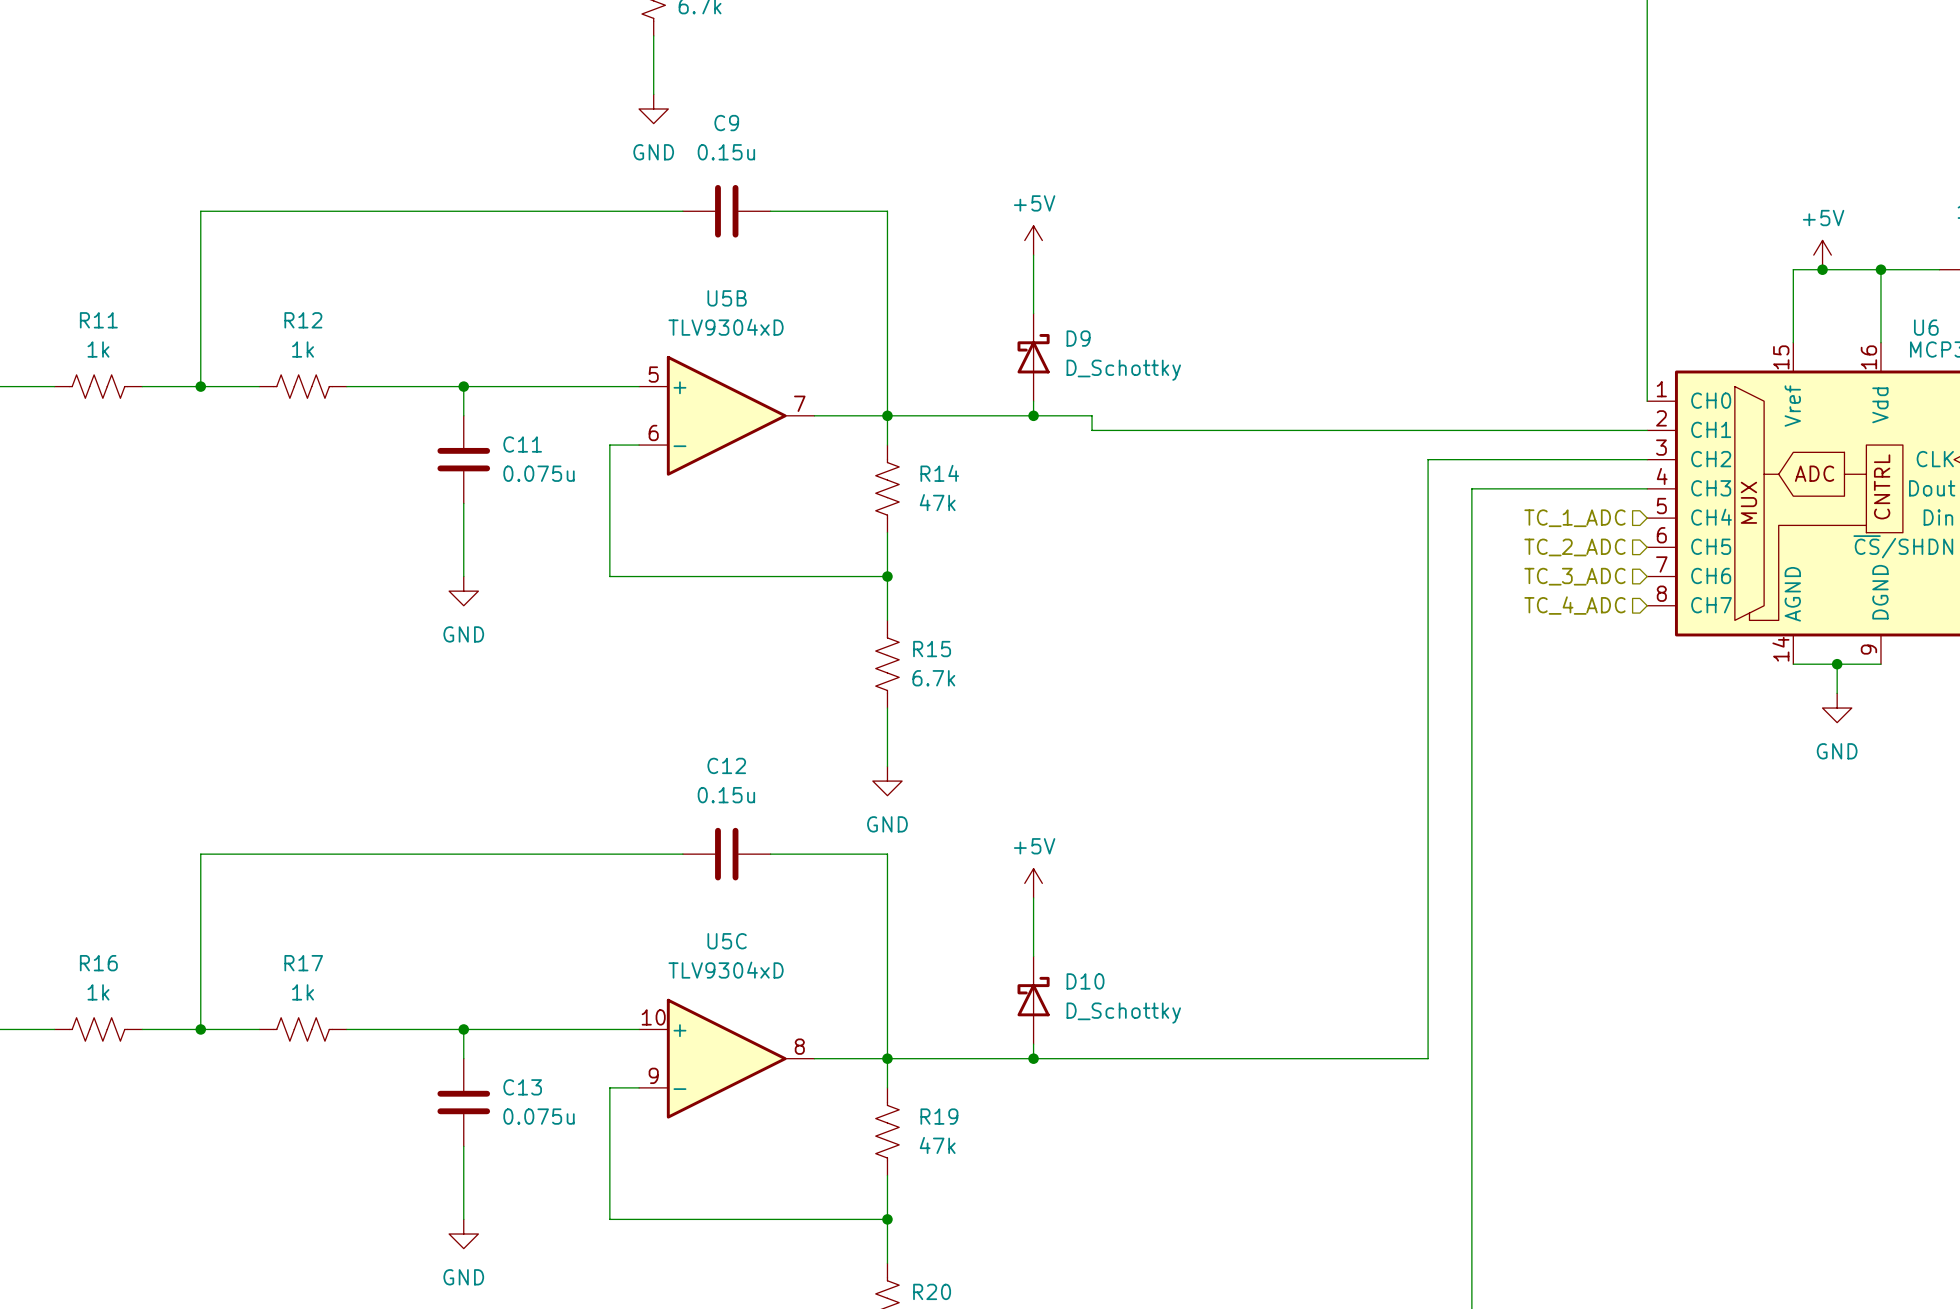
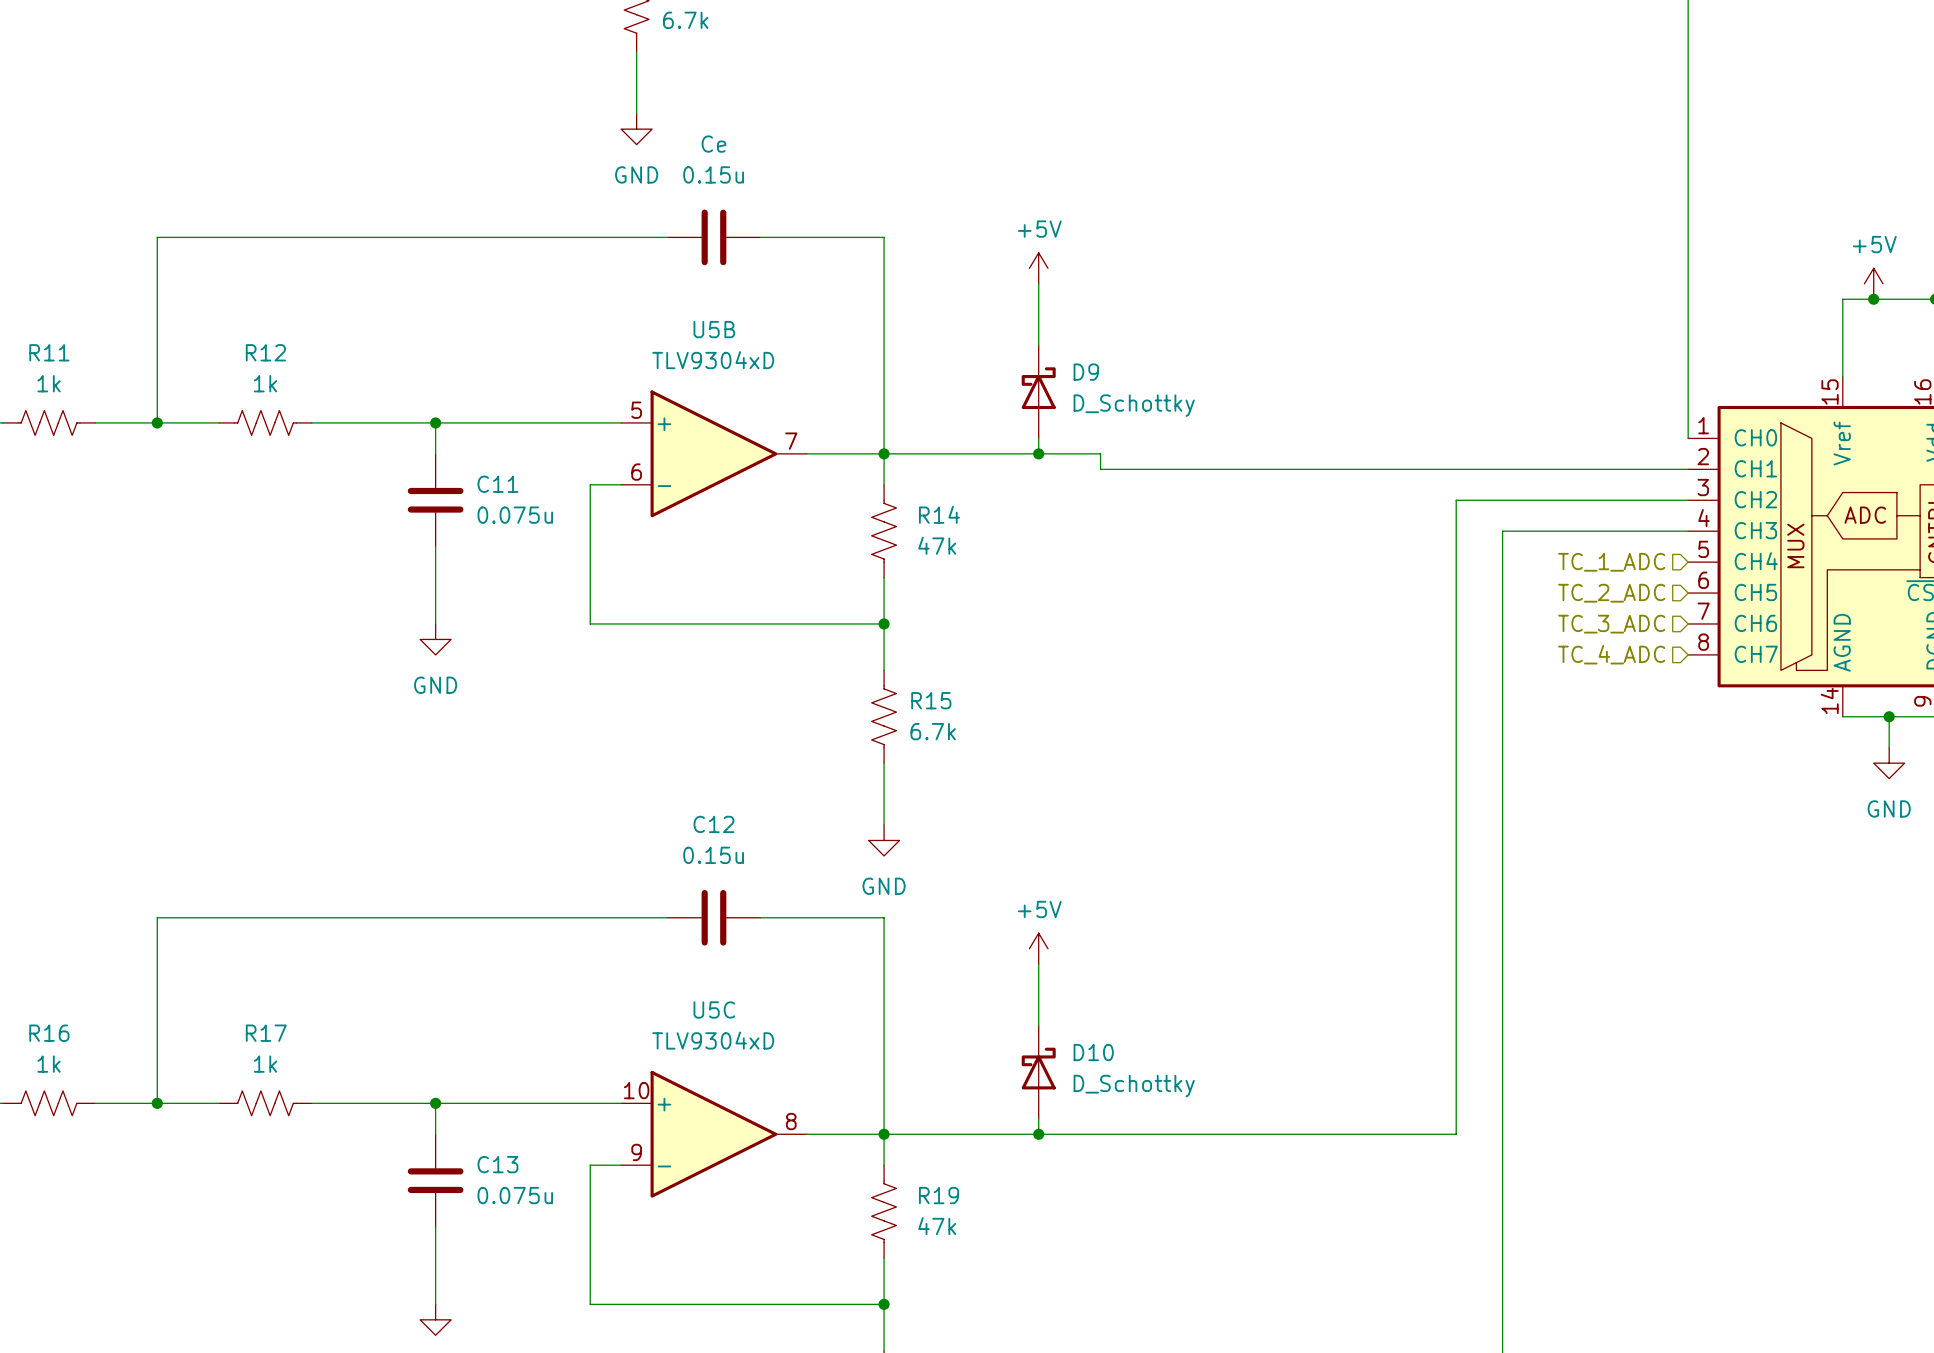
C9 name: C9 (726, 123) -> Ce (713, 144)

